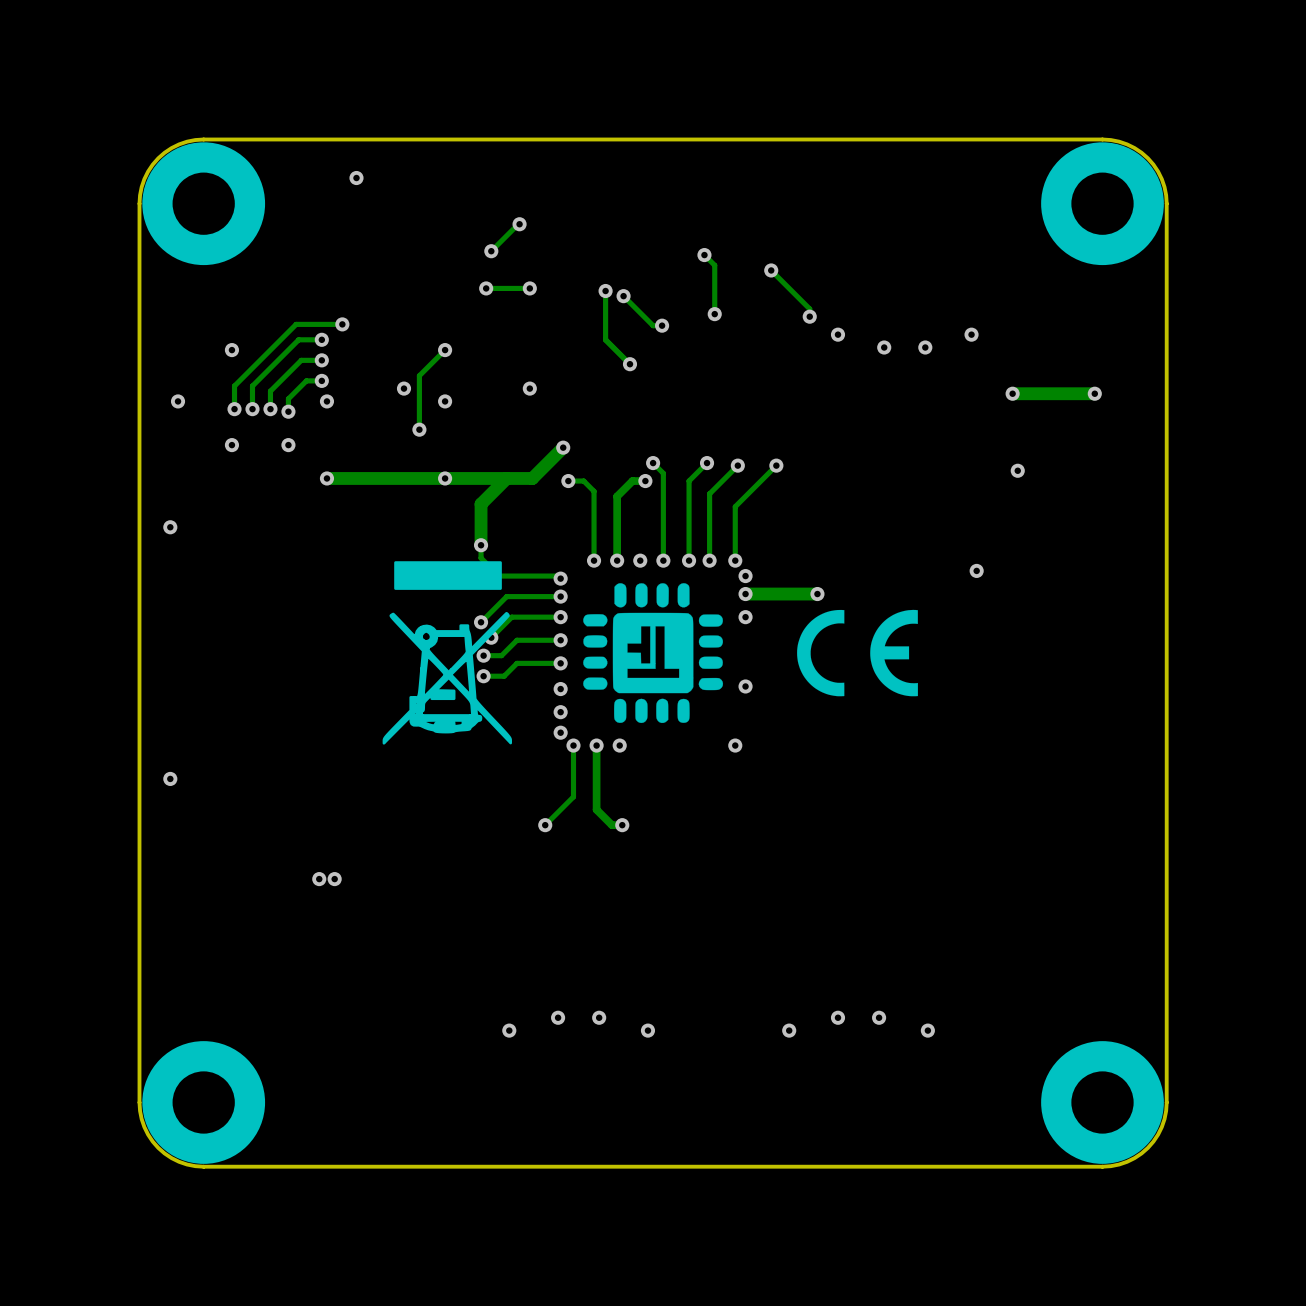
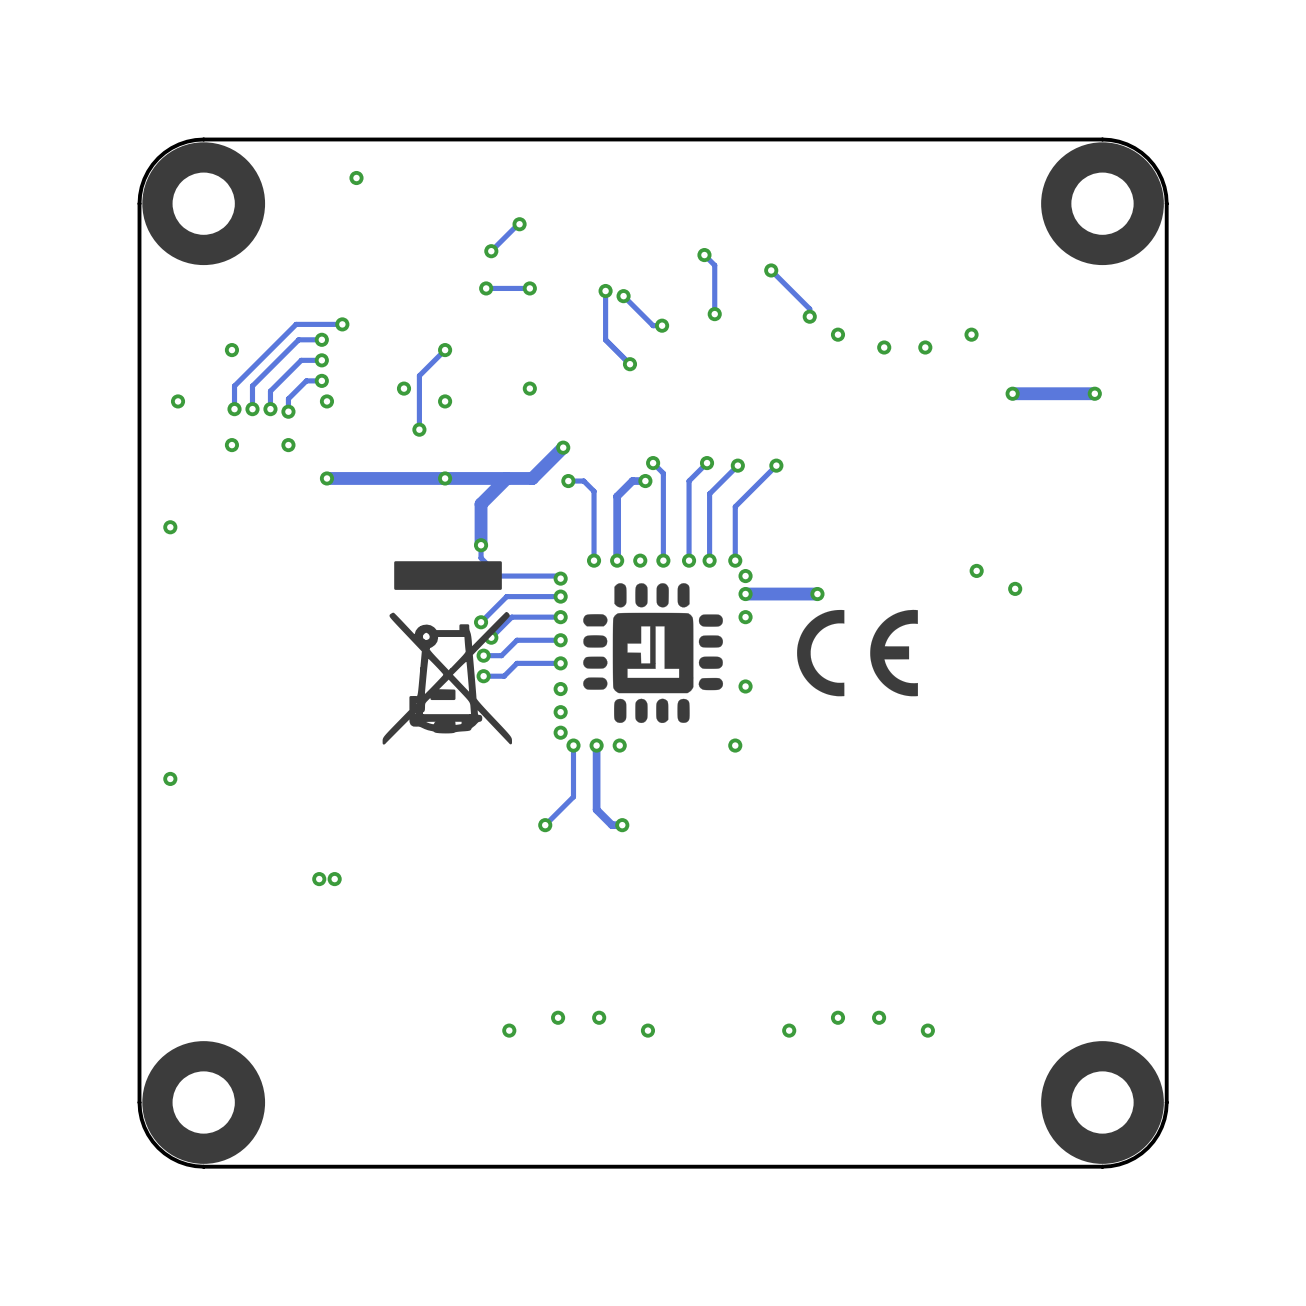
via position: (1017, 470) -> (1015, 588)

